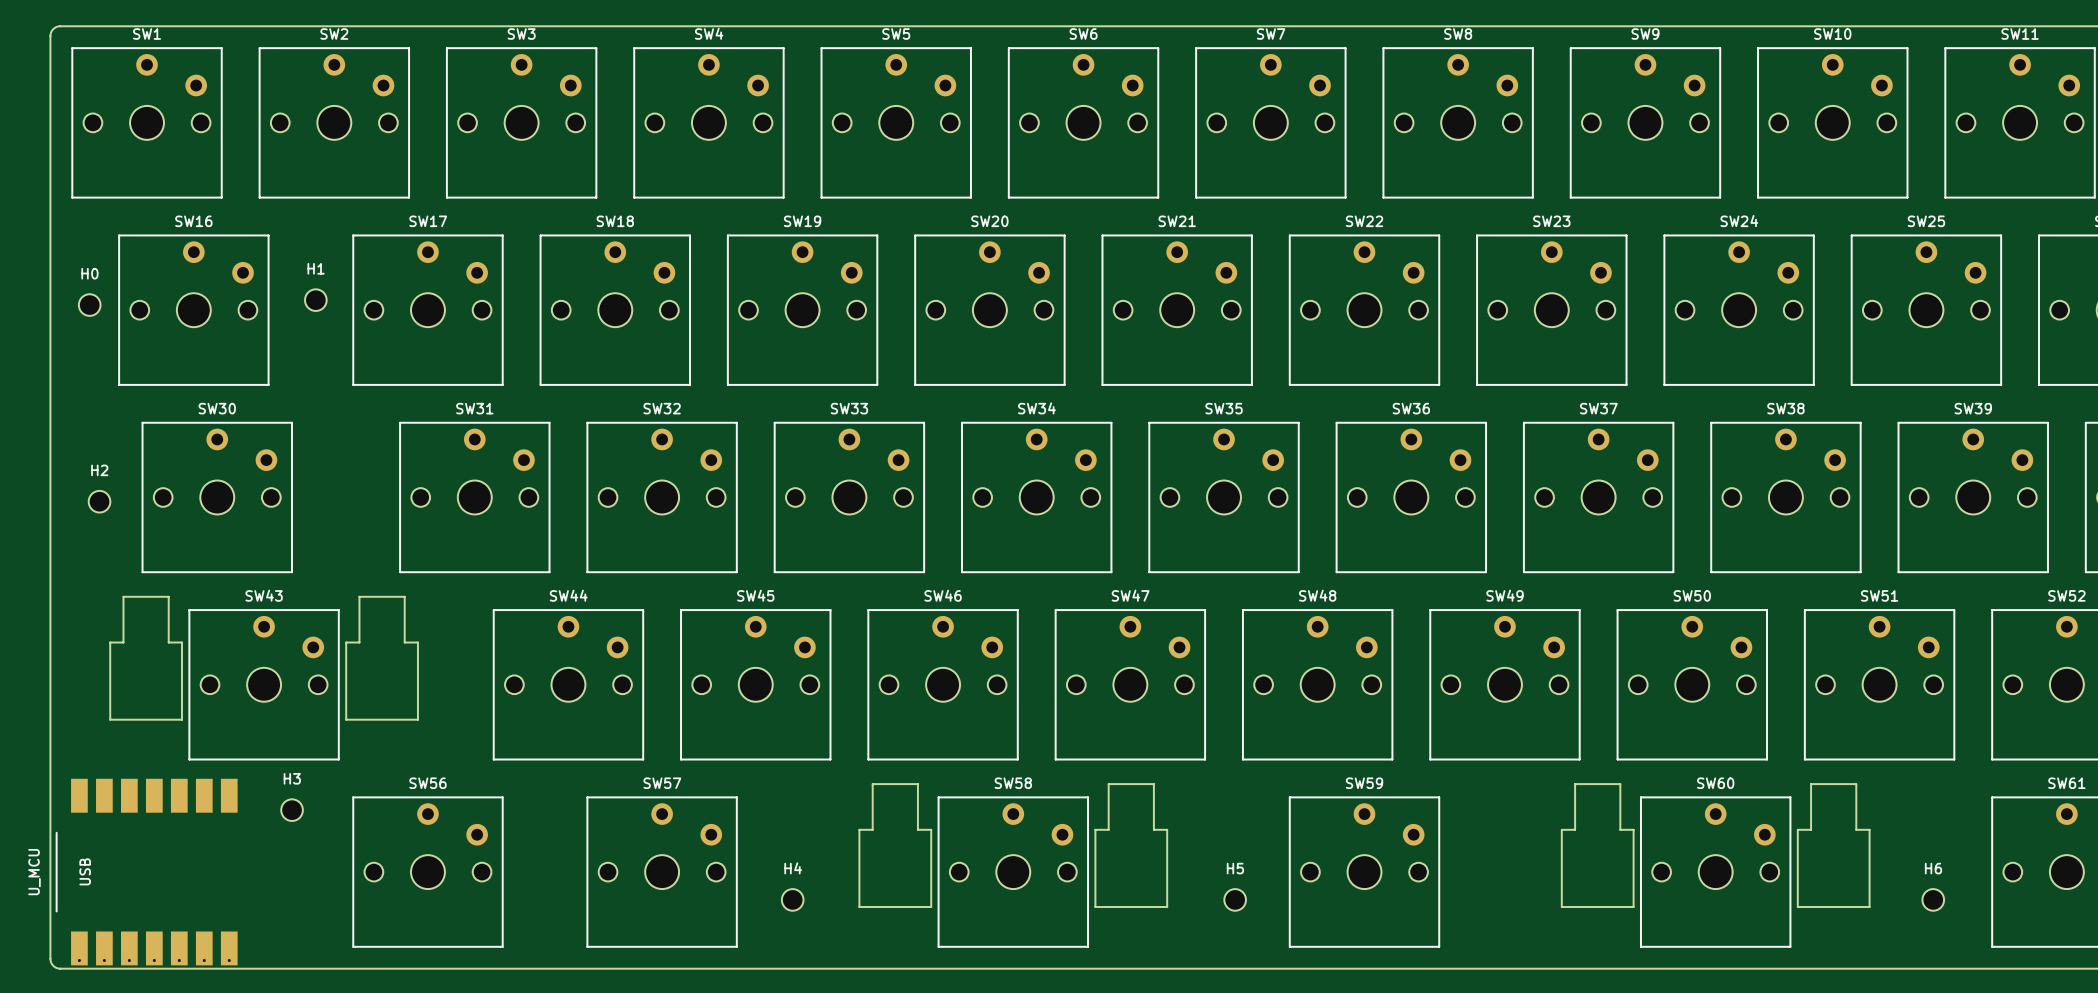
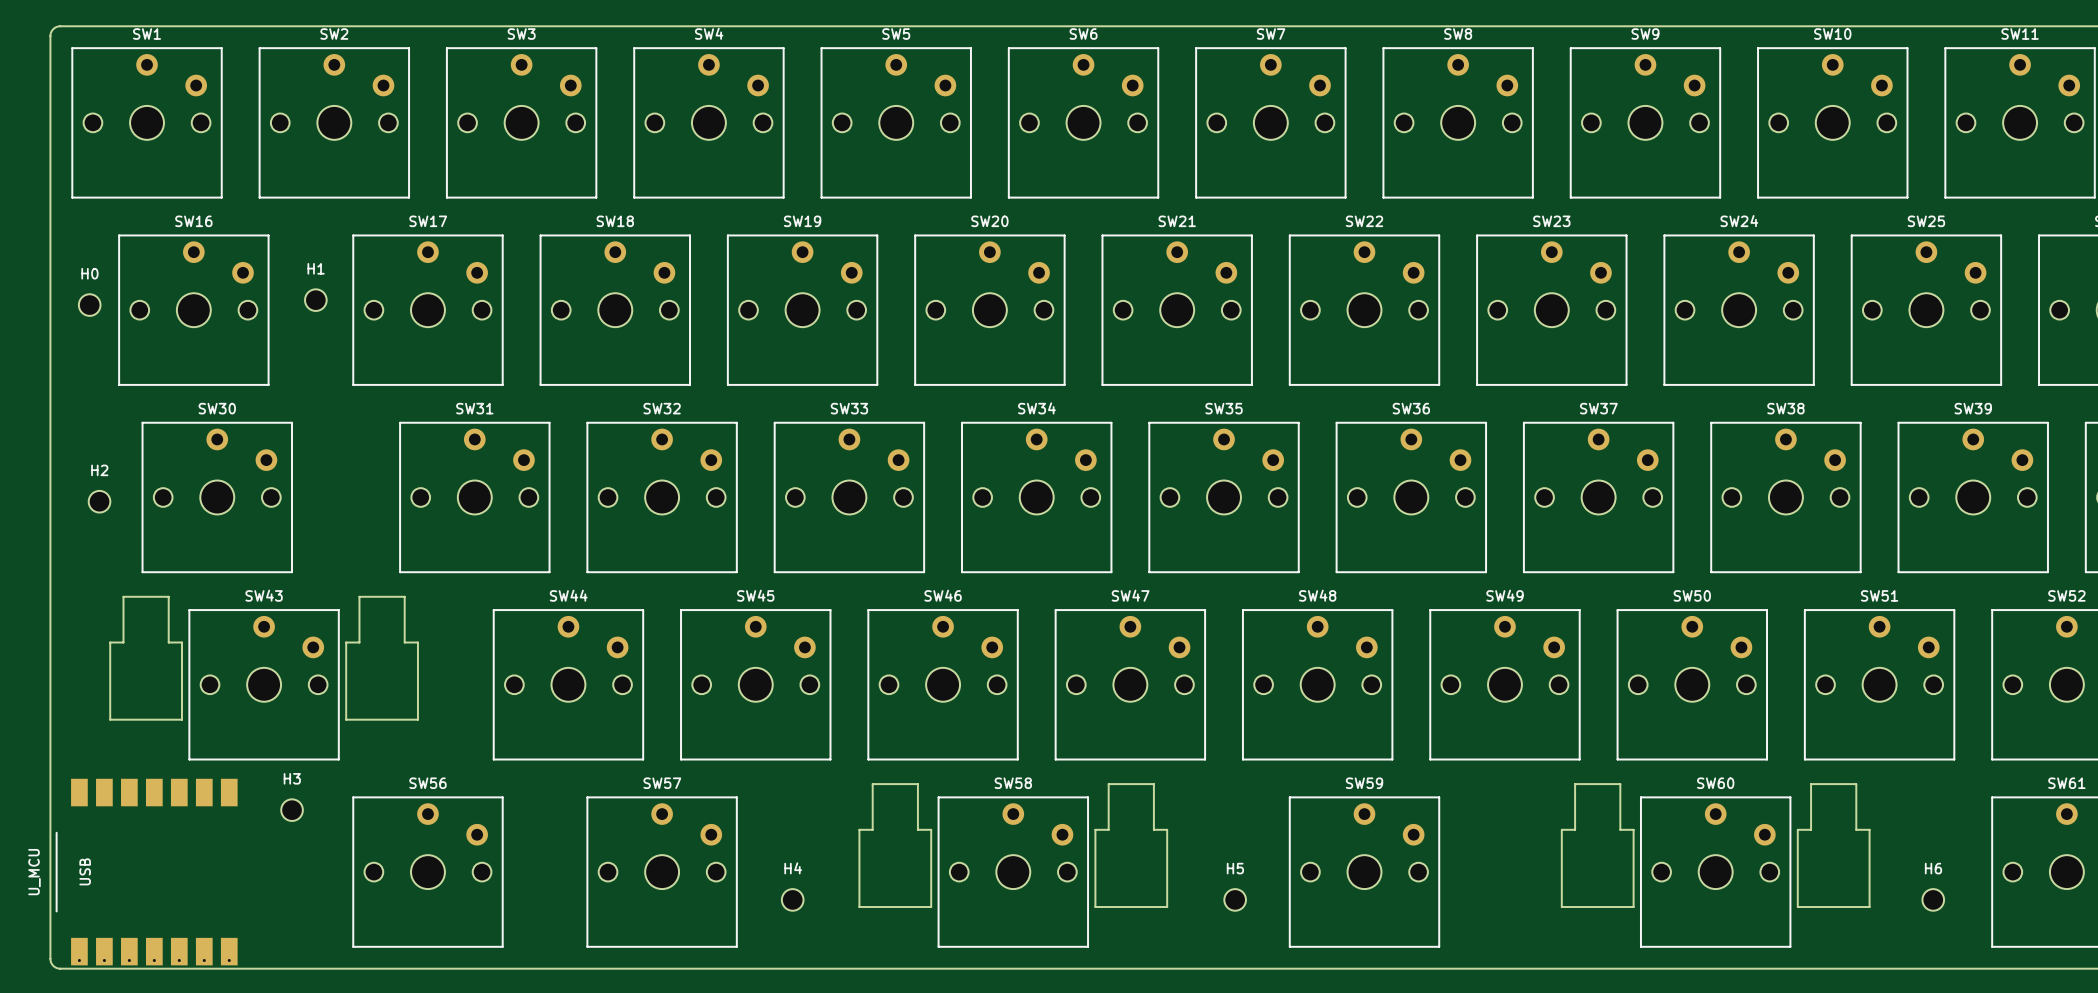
U_MCU footprint: [55, 778, 238, 966] -> [55, 778, 238, 966]

